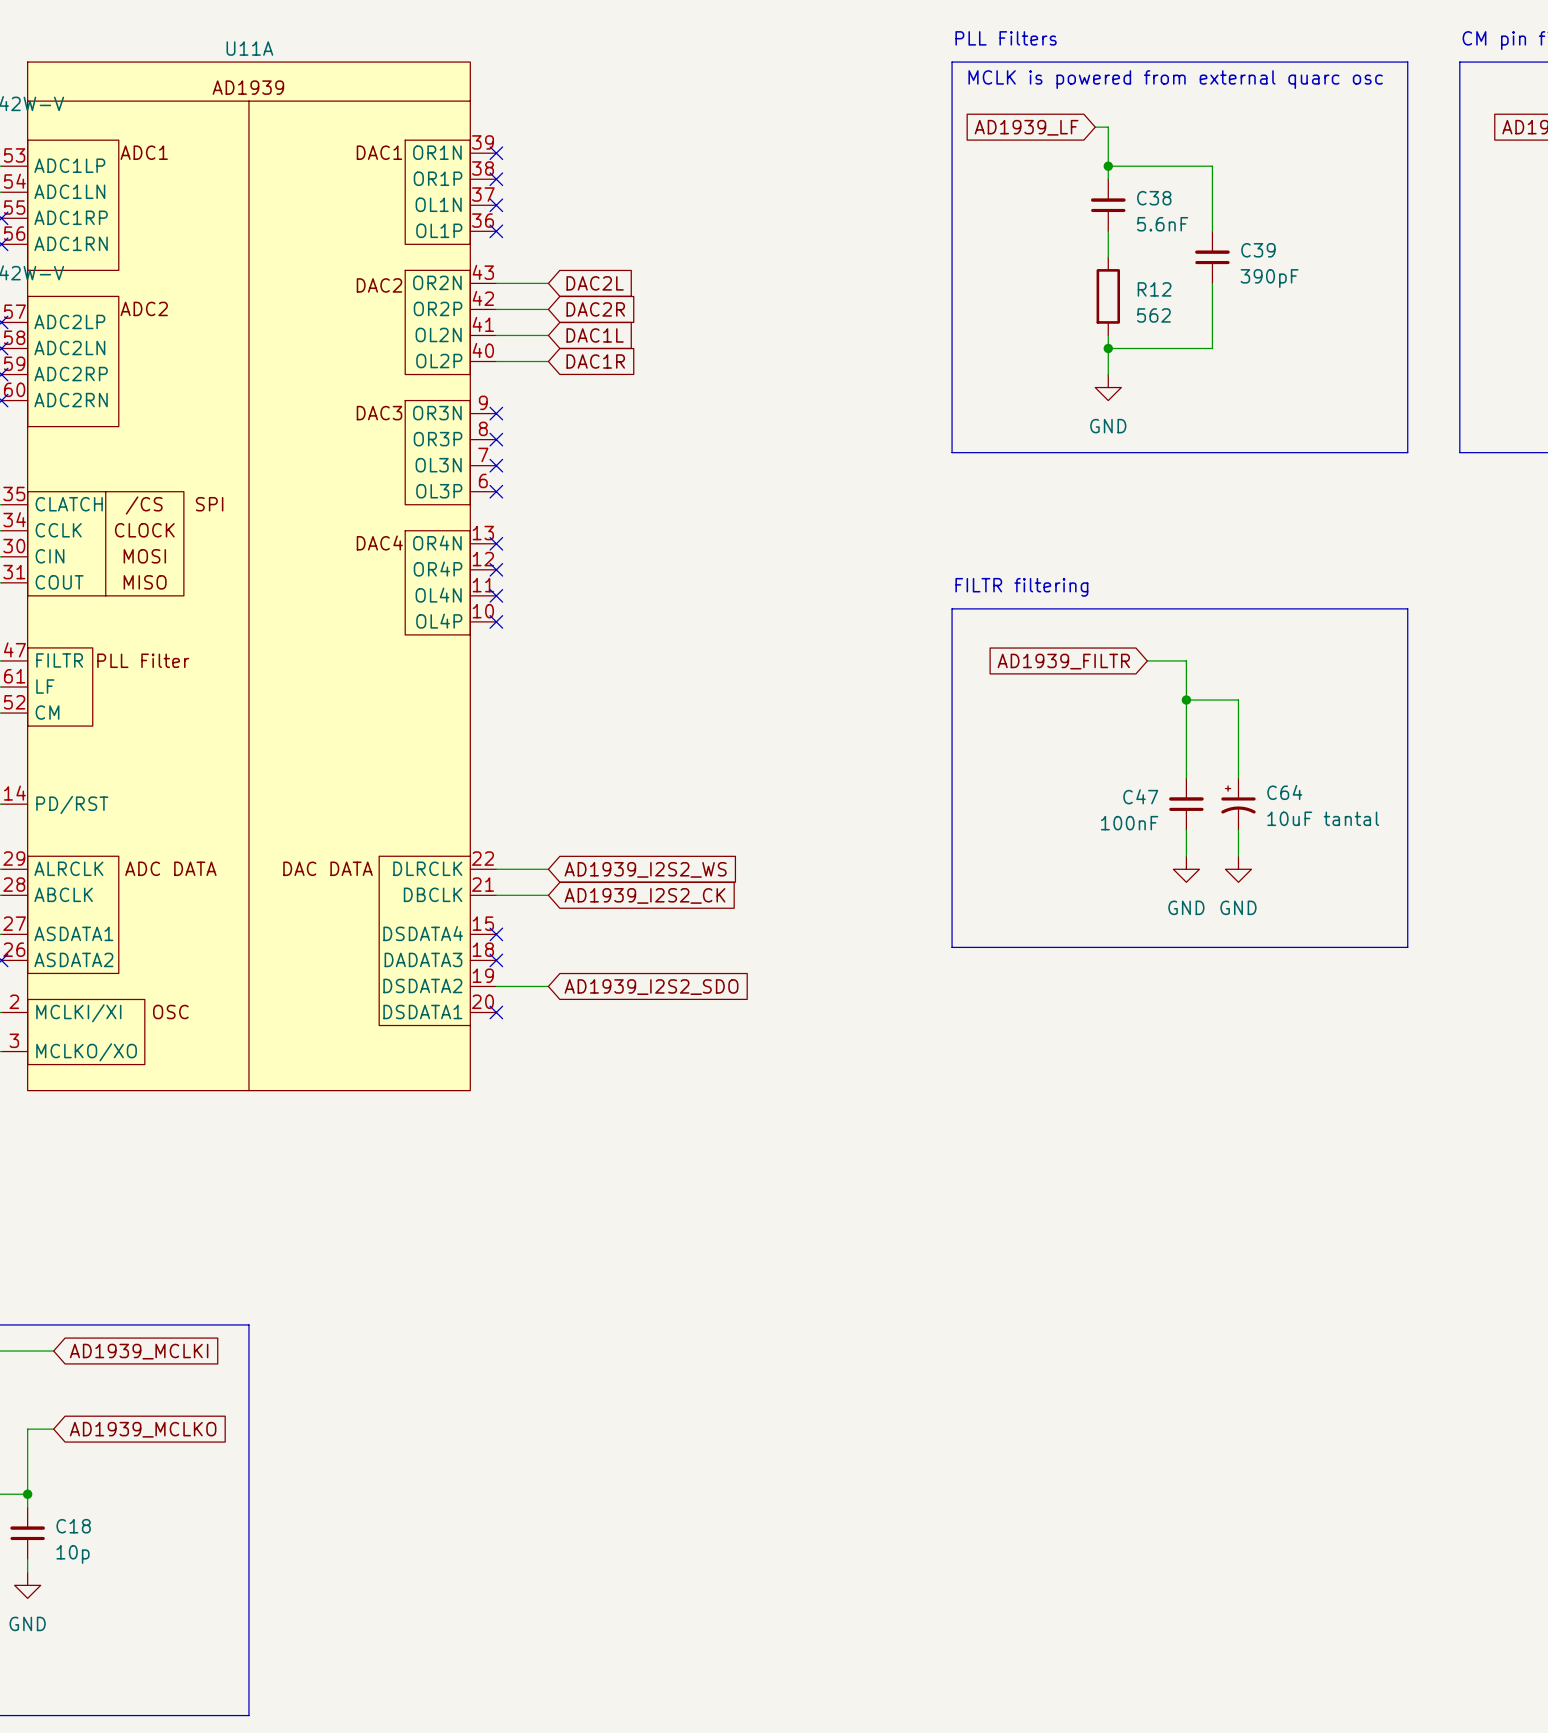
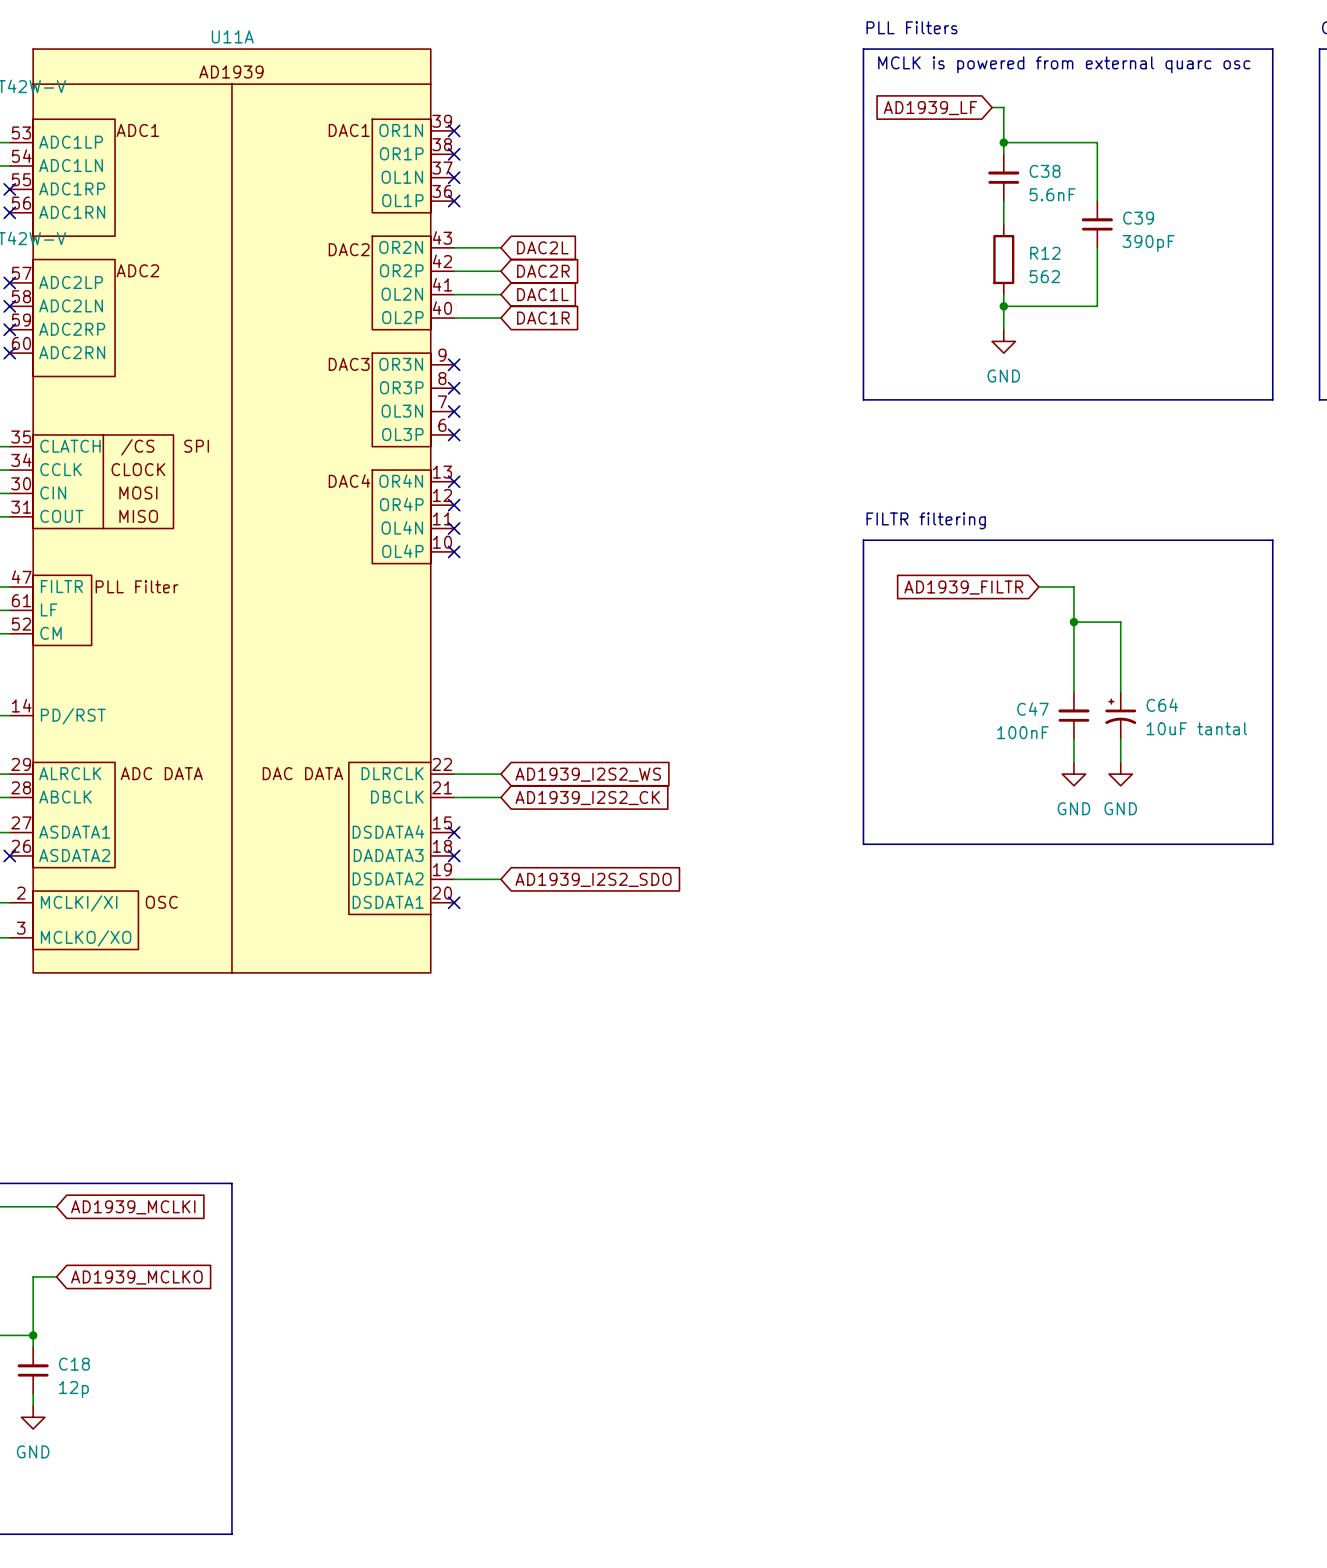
C18 value: 10p (73, 1554) -> 12p (73, 1389)

